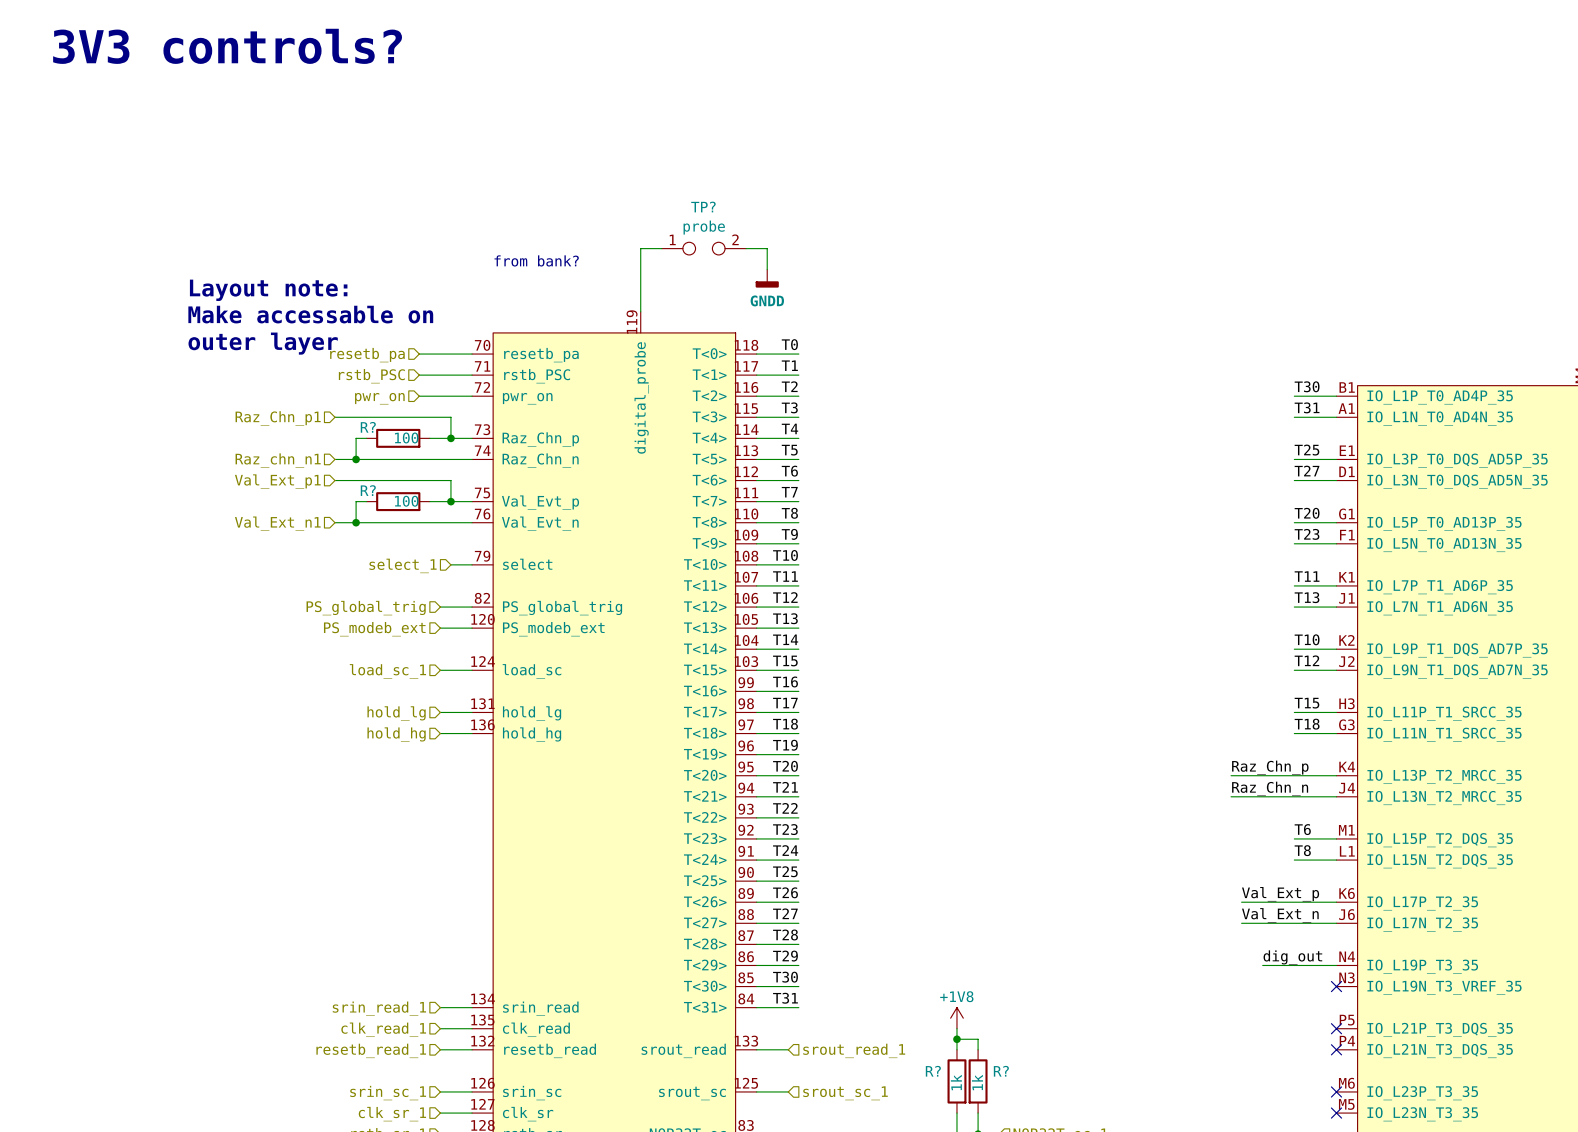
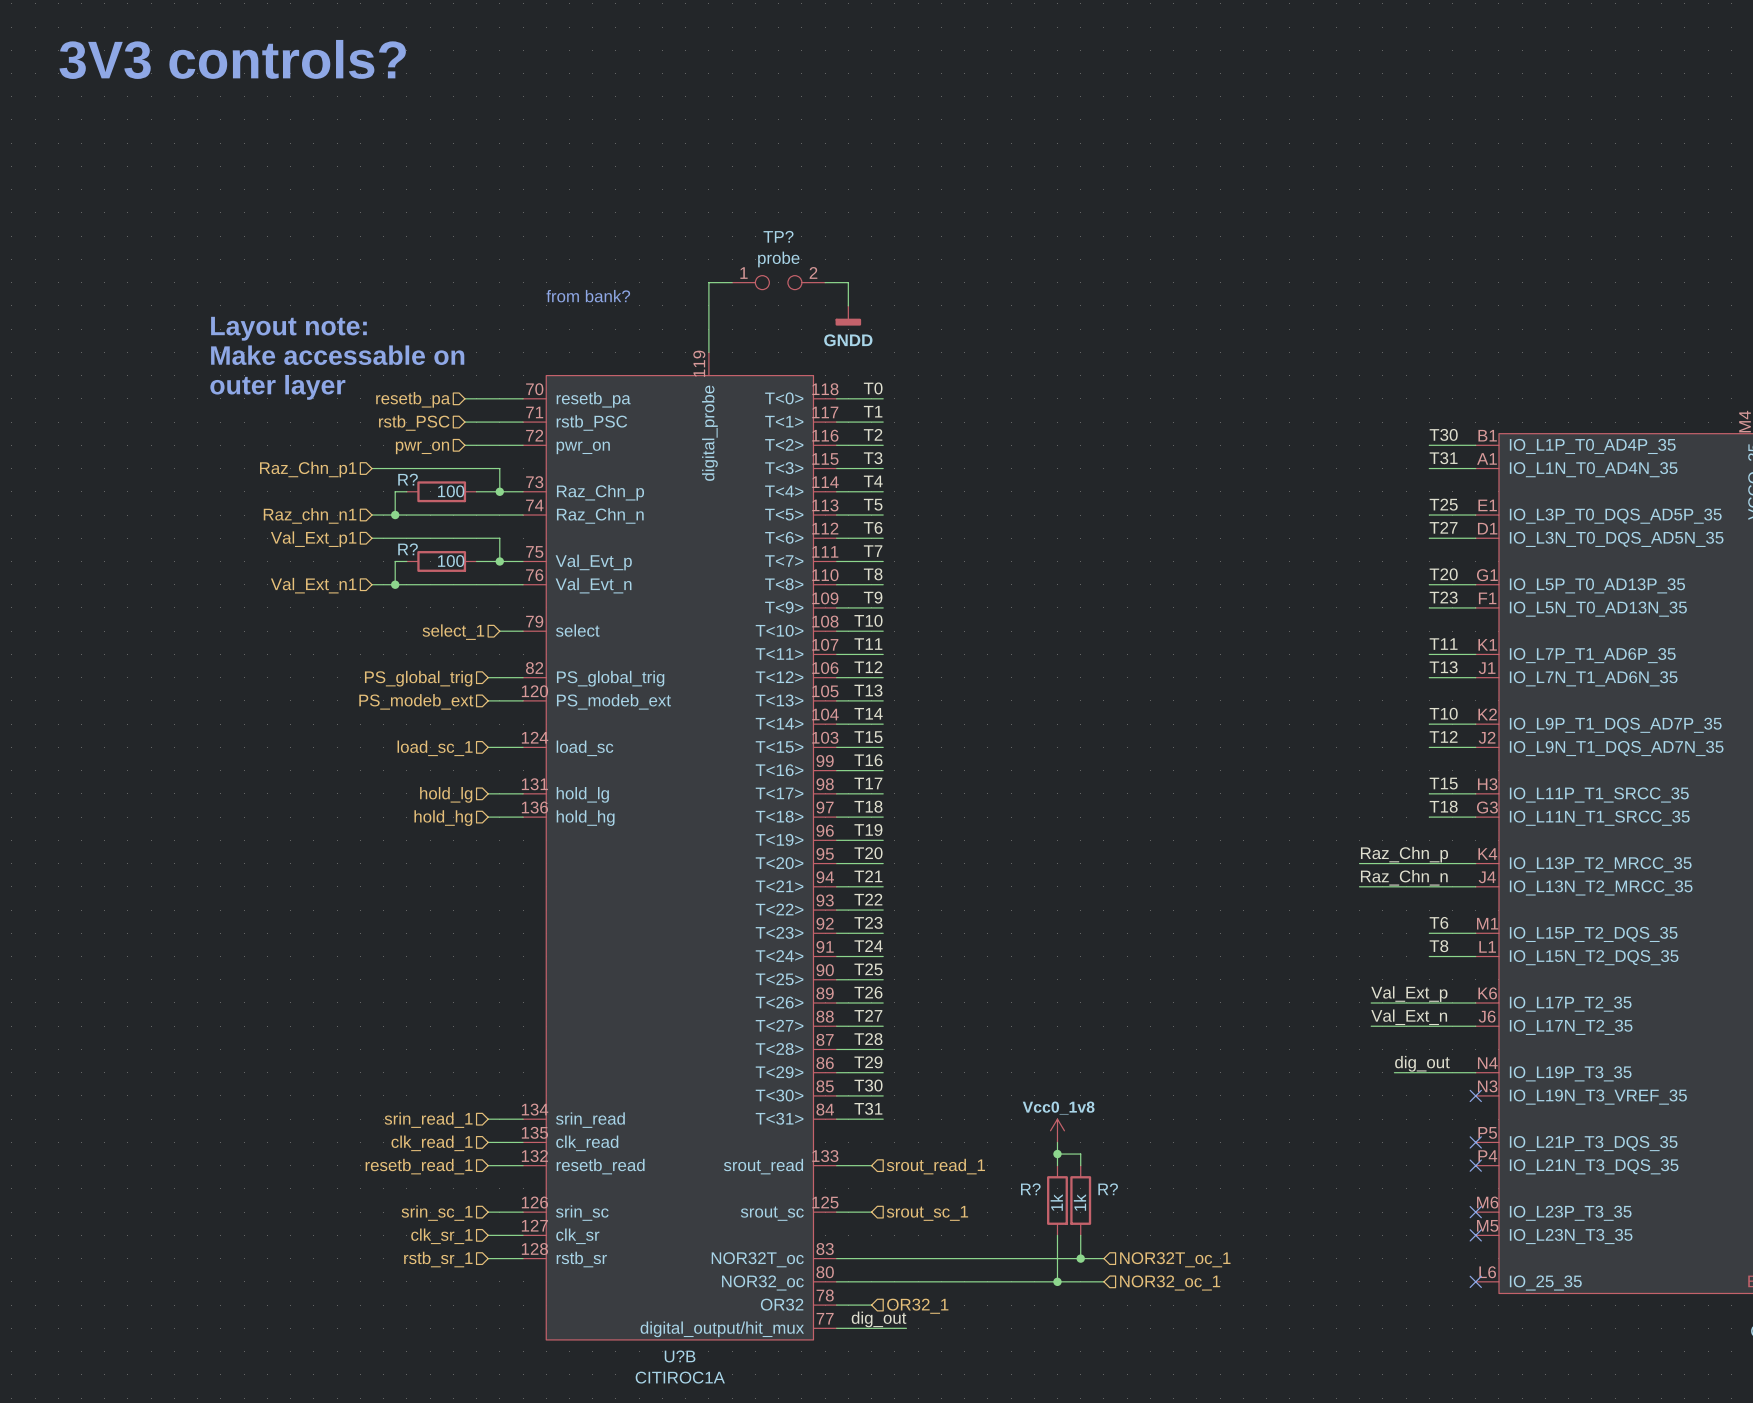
power symbol: +1V8 (956, 1018) -> none
part: none -> Vcc0_1v8 (1057, 1130)

